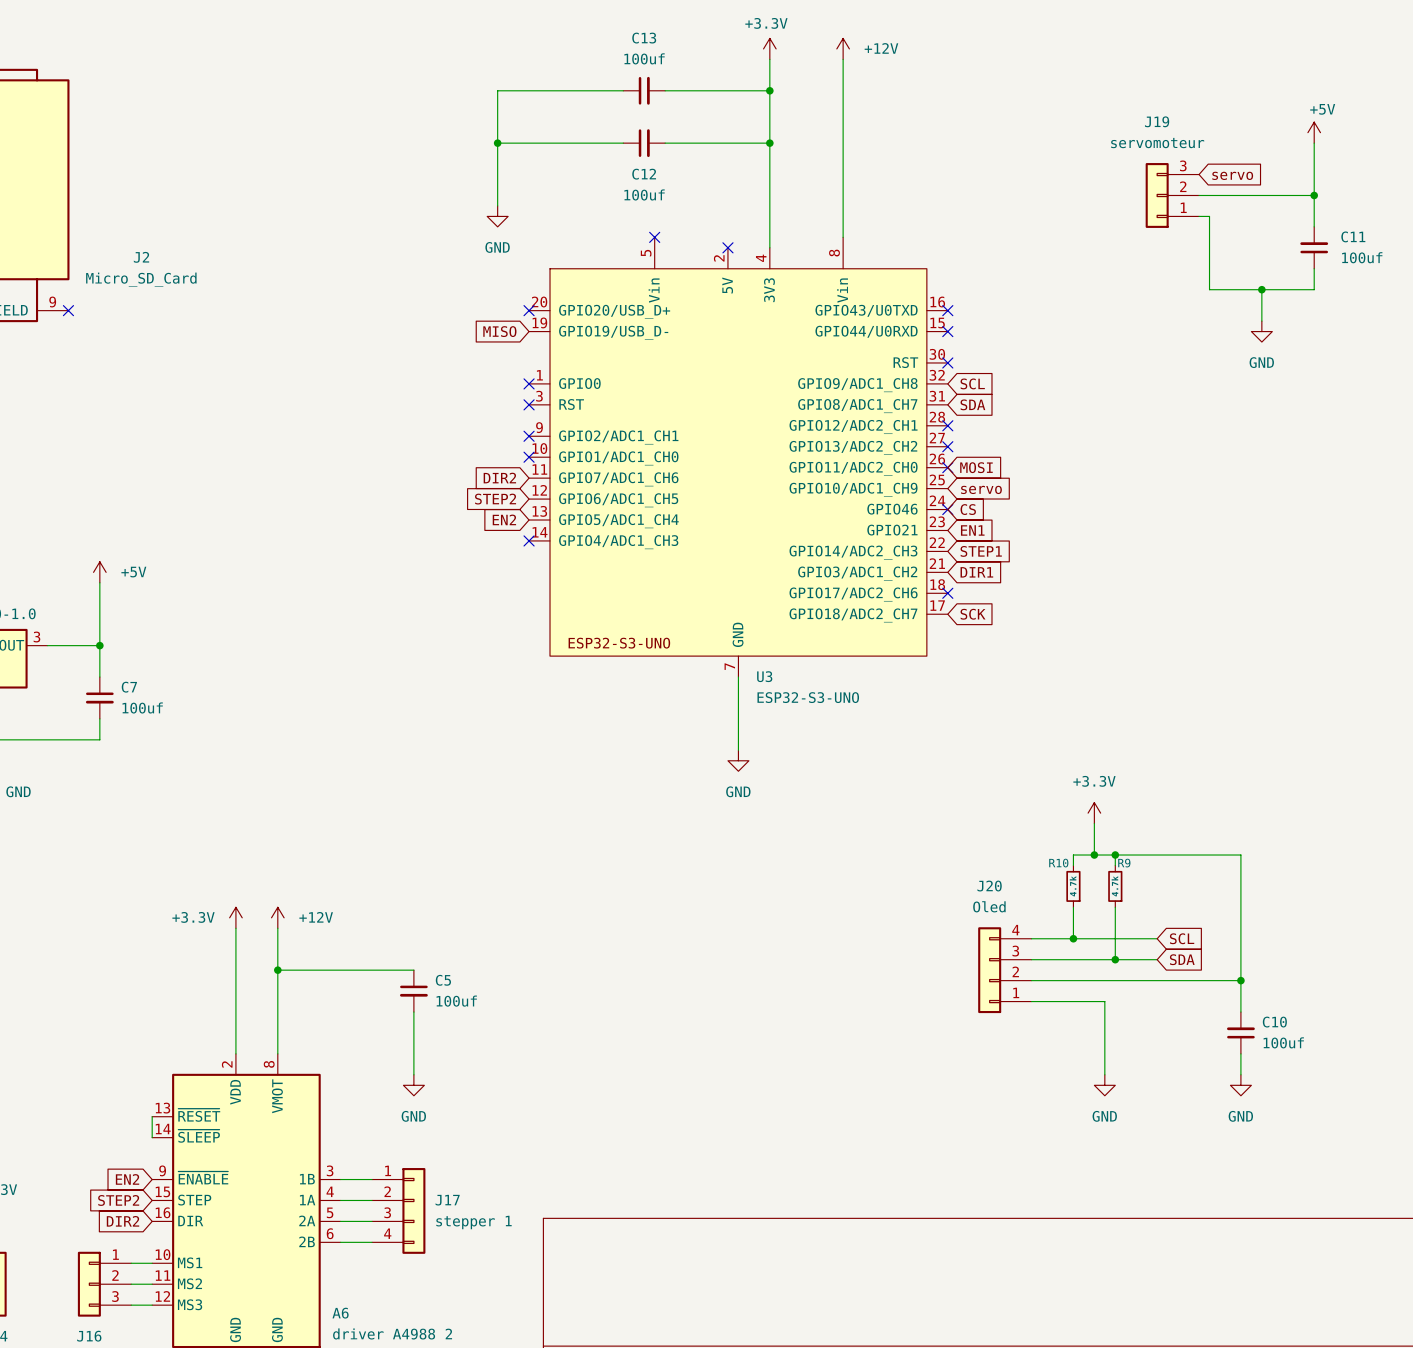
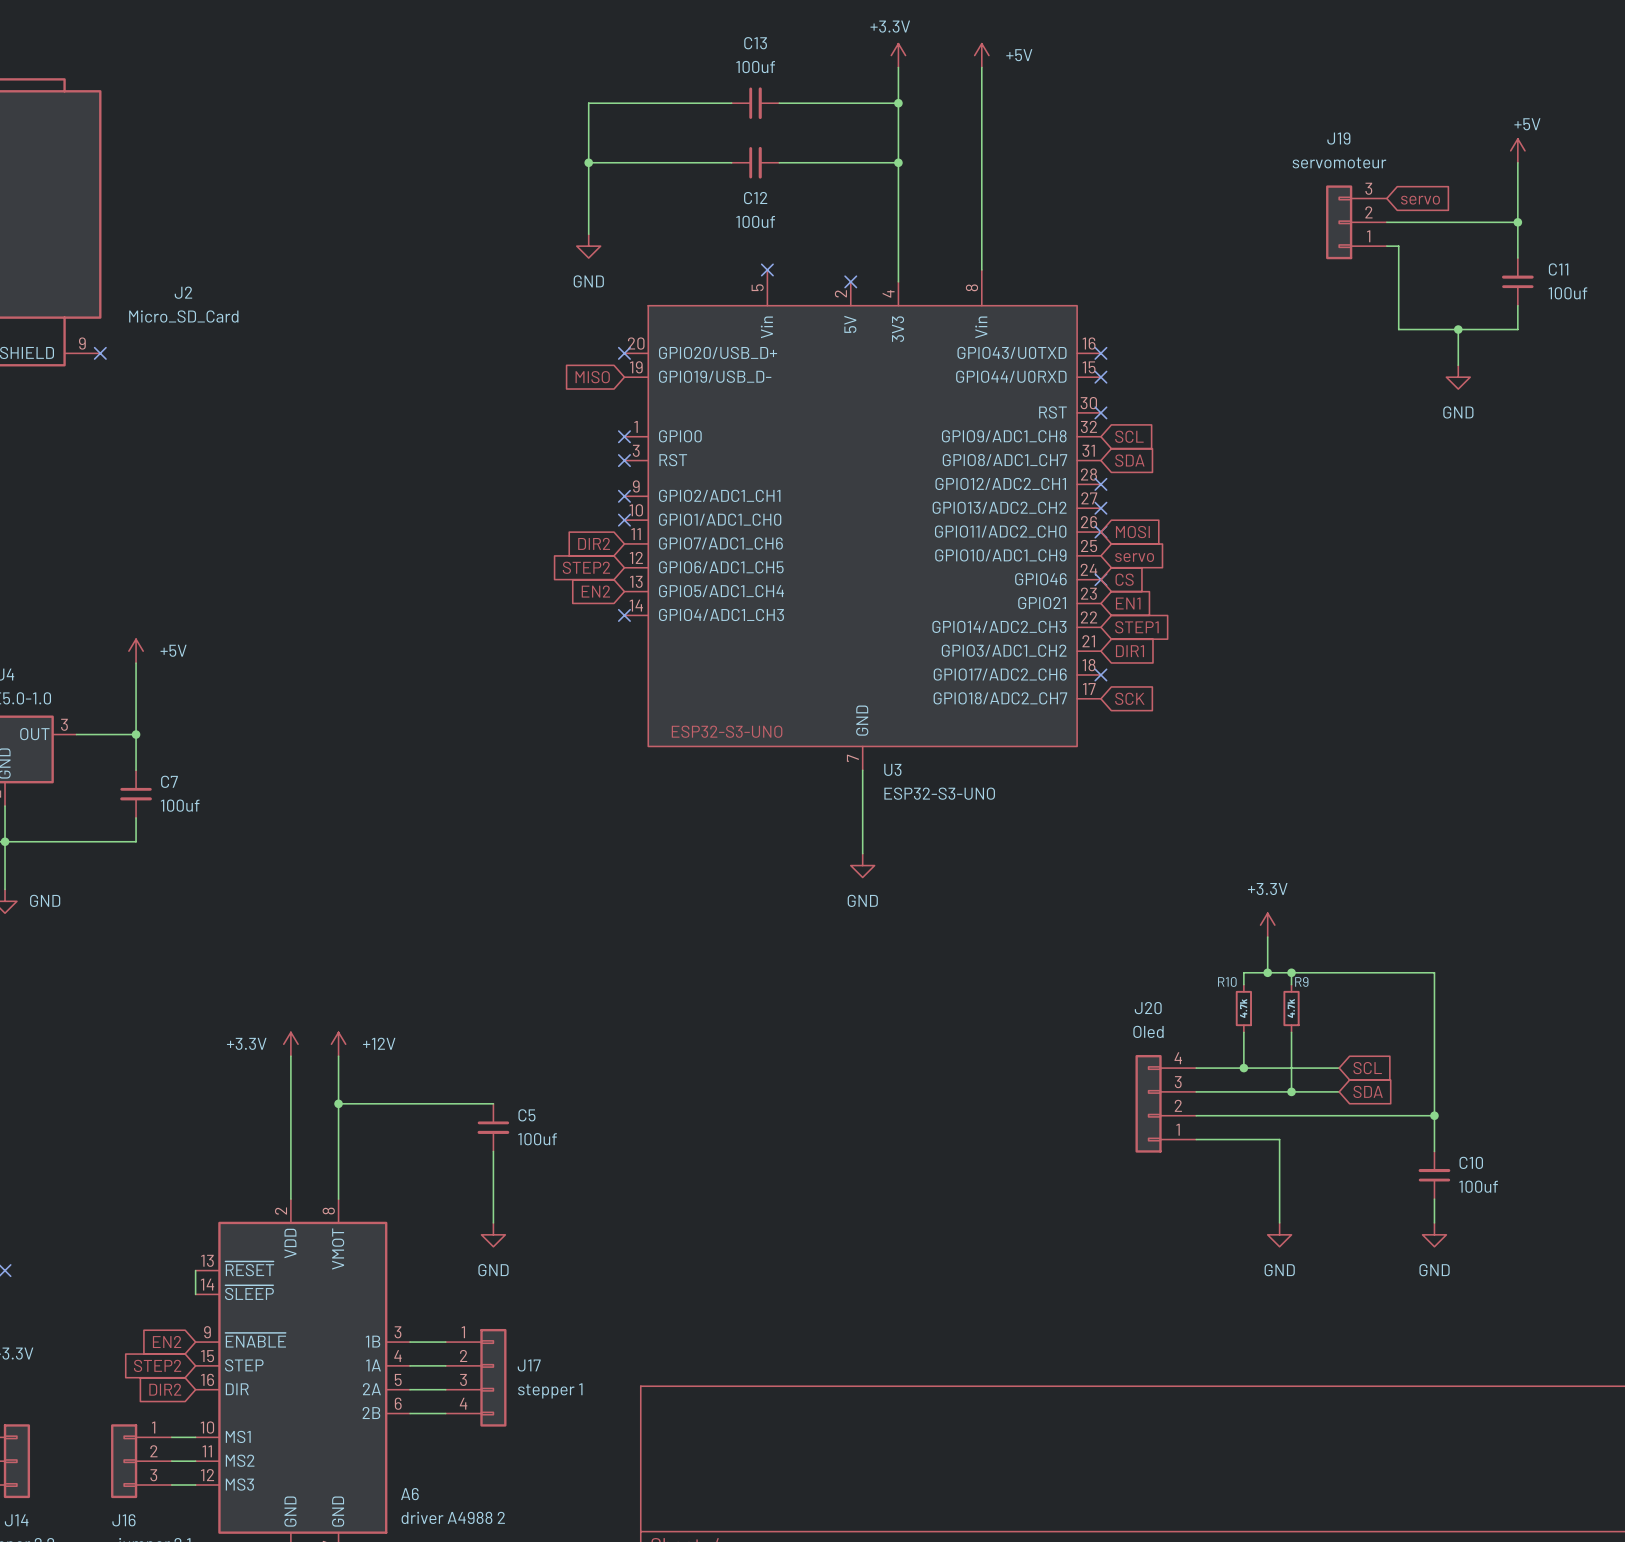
power symbol: +12V (843, 48) -> +5V (981, 55)

